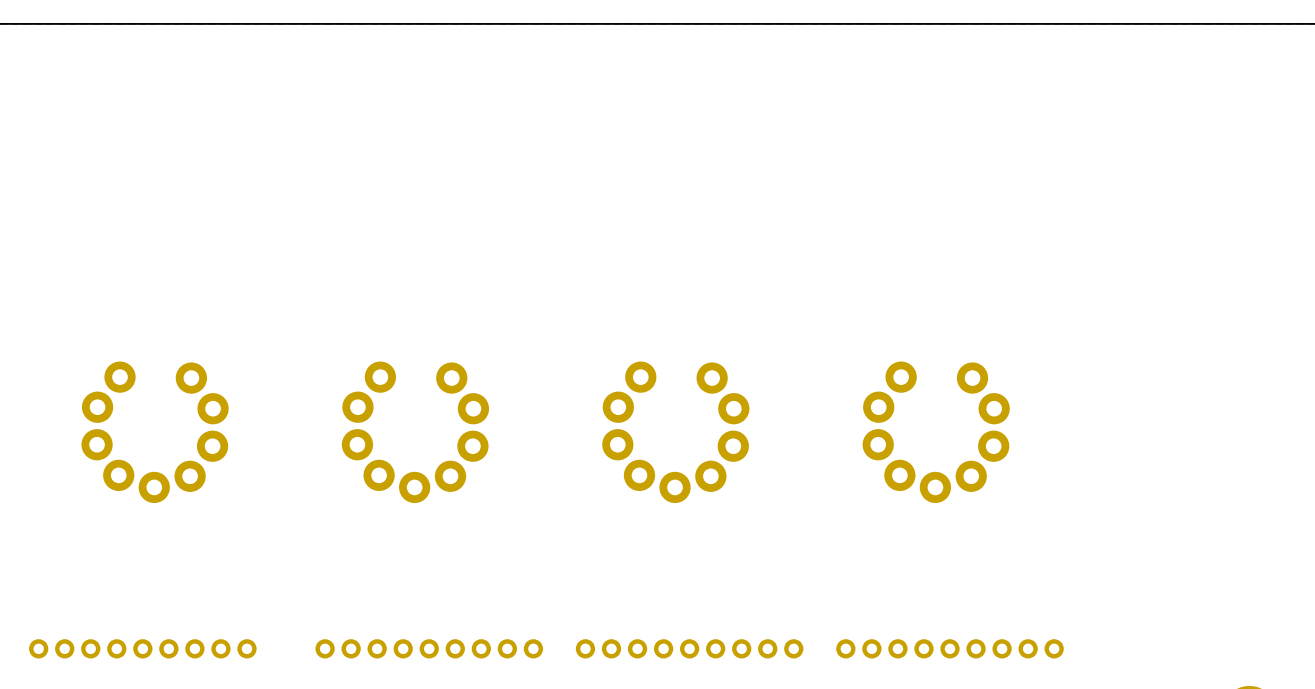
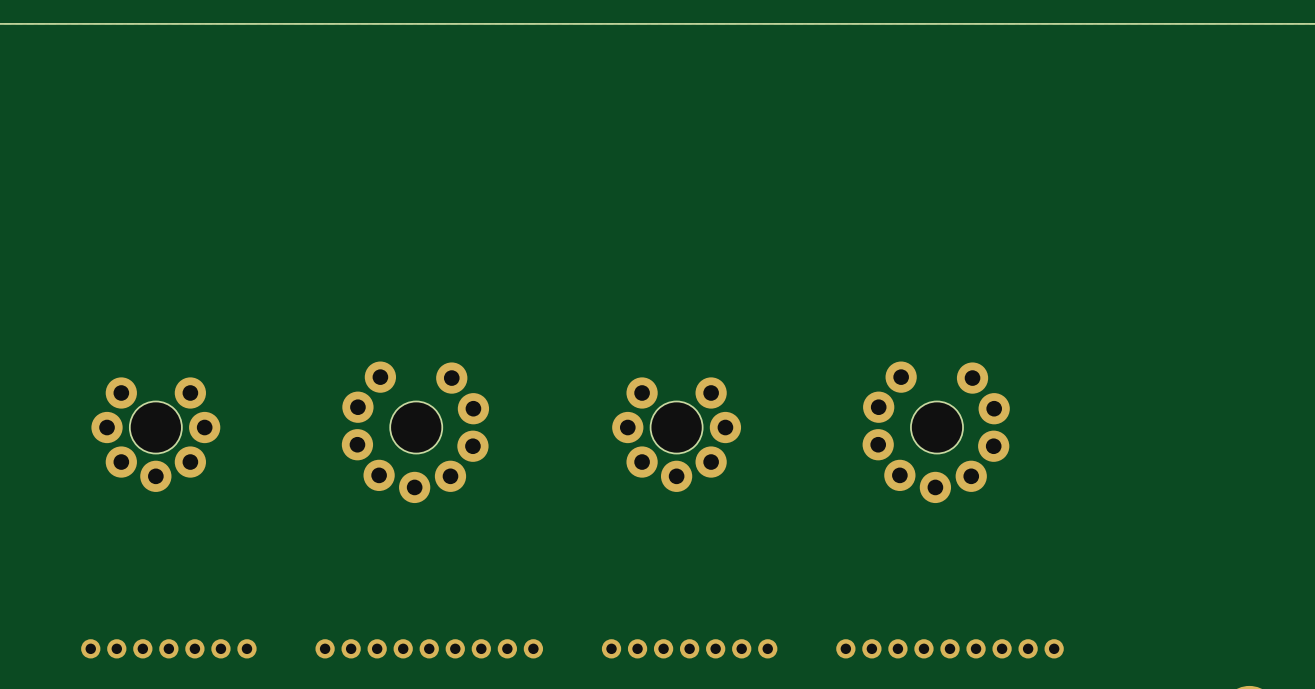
part footprint: [81, 361, 229, 504] -> [91, 377, 221, 492]
part footprint: [341, 361, 490, 504] -> [341, 361, 490, 504]
part footprint: [602, 361, 750, 504] -> [612, 377, 742, 492]
part footprint: [862, 361, 1010, 504] -> [862, 361, 1010, 504]
part footprint: [575, 639, 804, 659] -> [601, 639, 778, 659]
part: (142, 648) -> none

